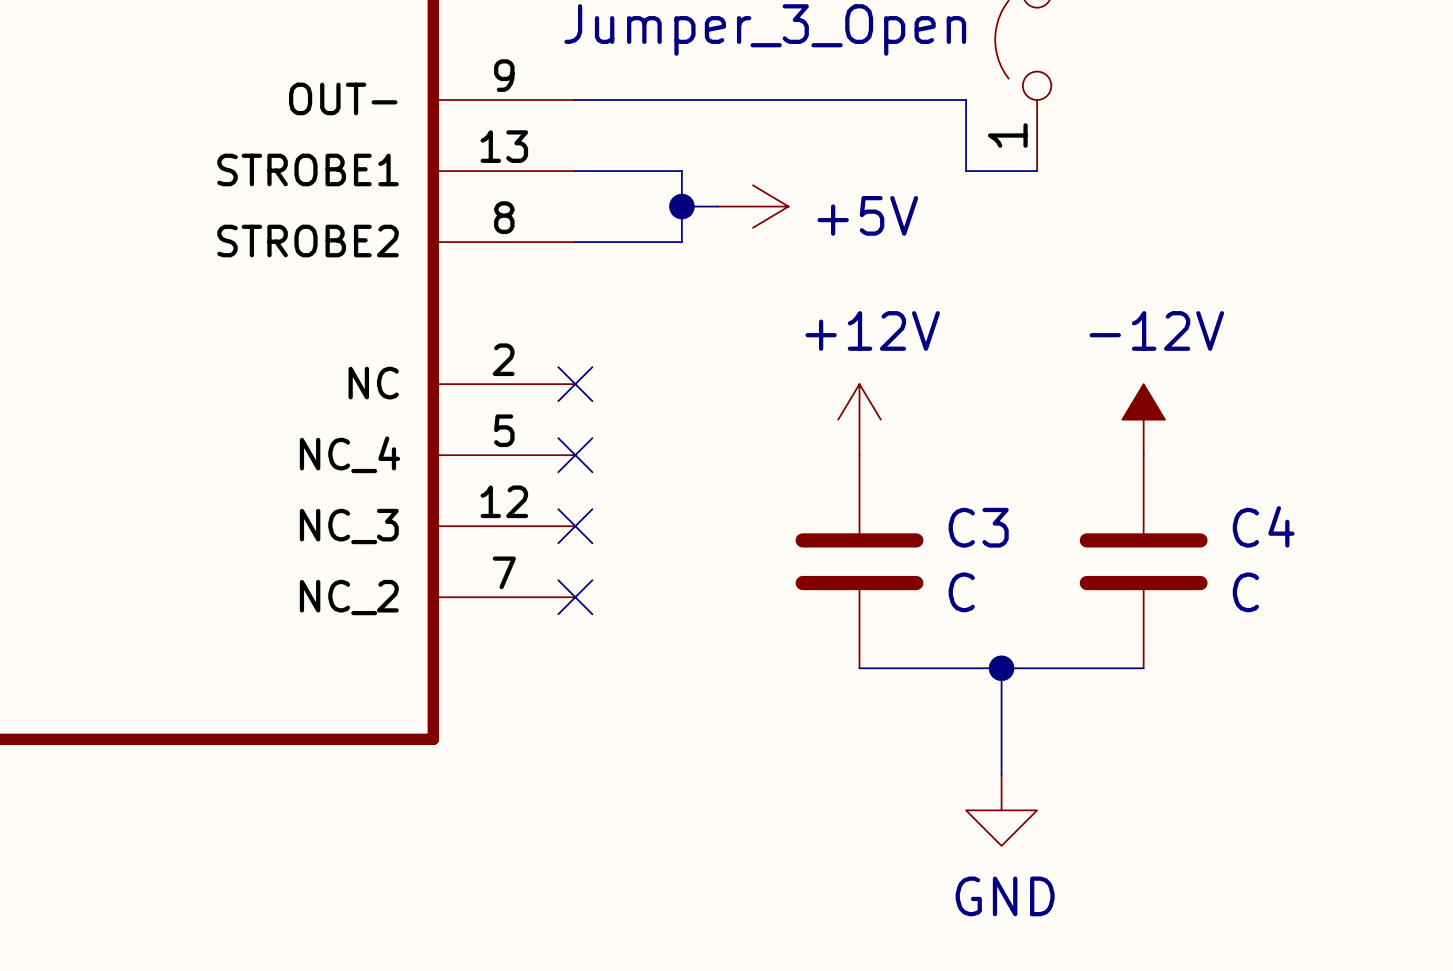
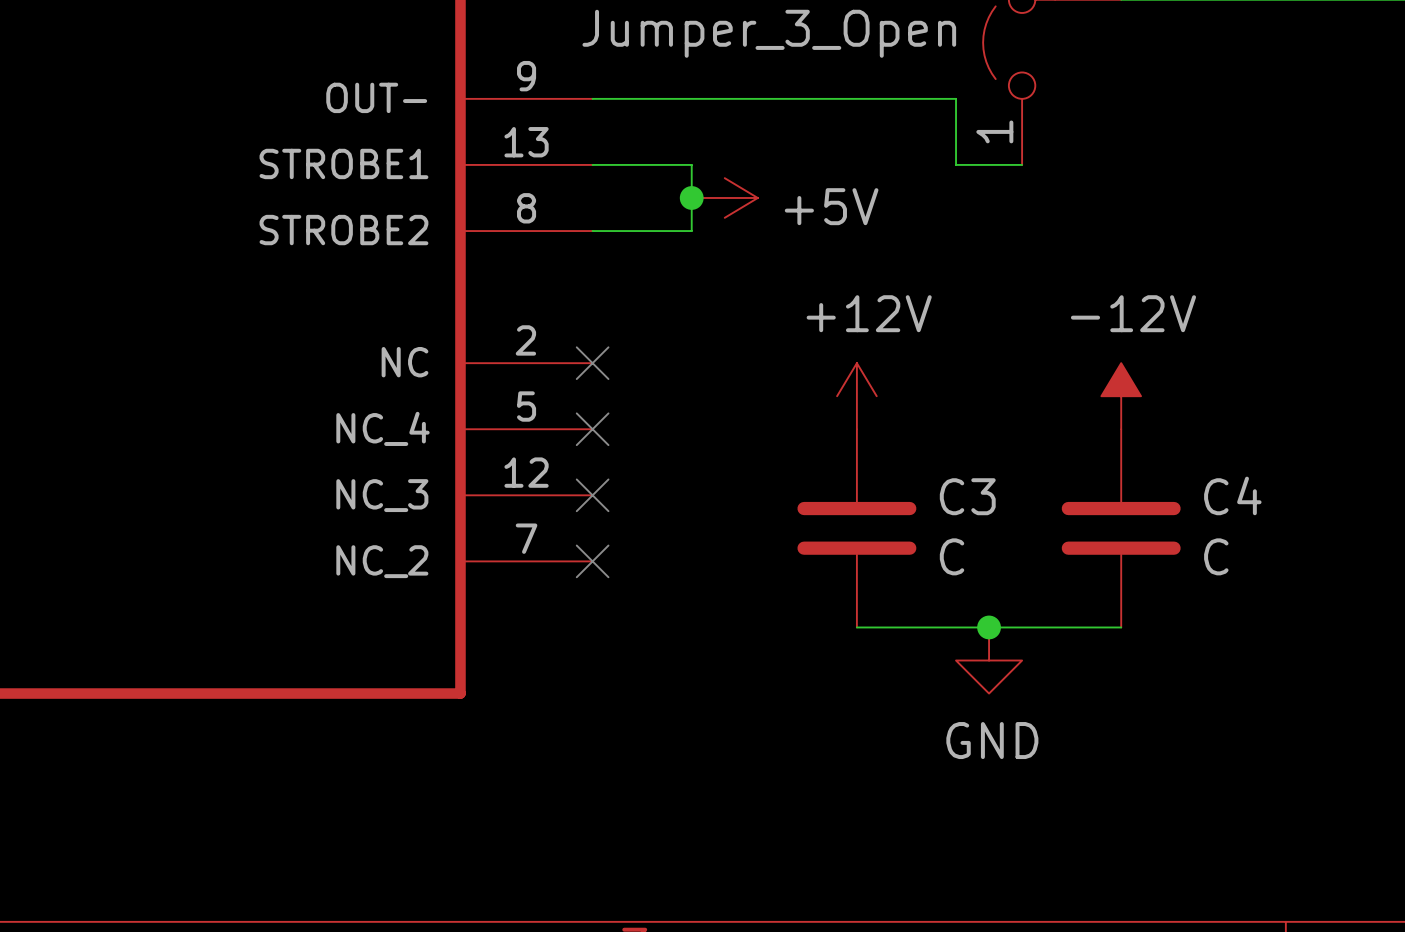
power symbol position: +5V (752, 206) -> +5V (724, 197)
wire: (1001, 668) (1001, 774) -> none
power symbol position: GND (1001, 810) -> GND (989, 660)

